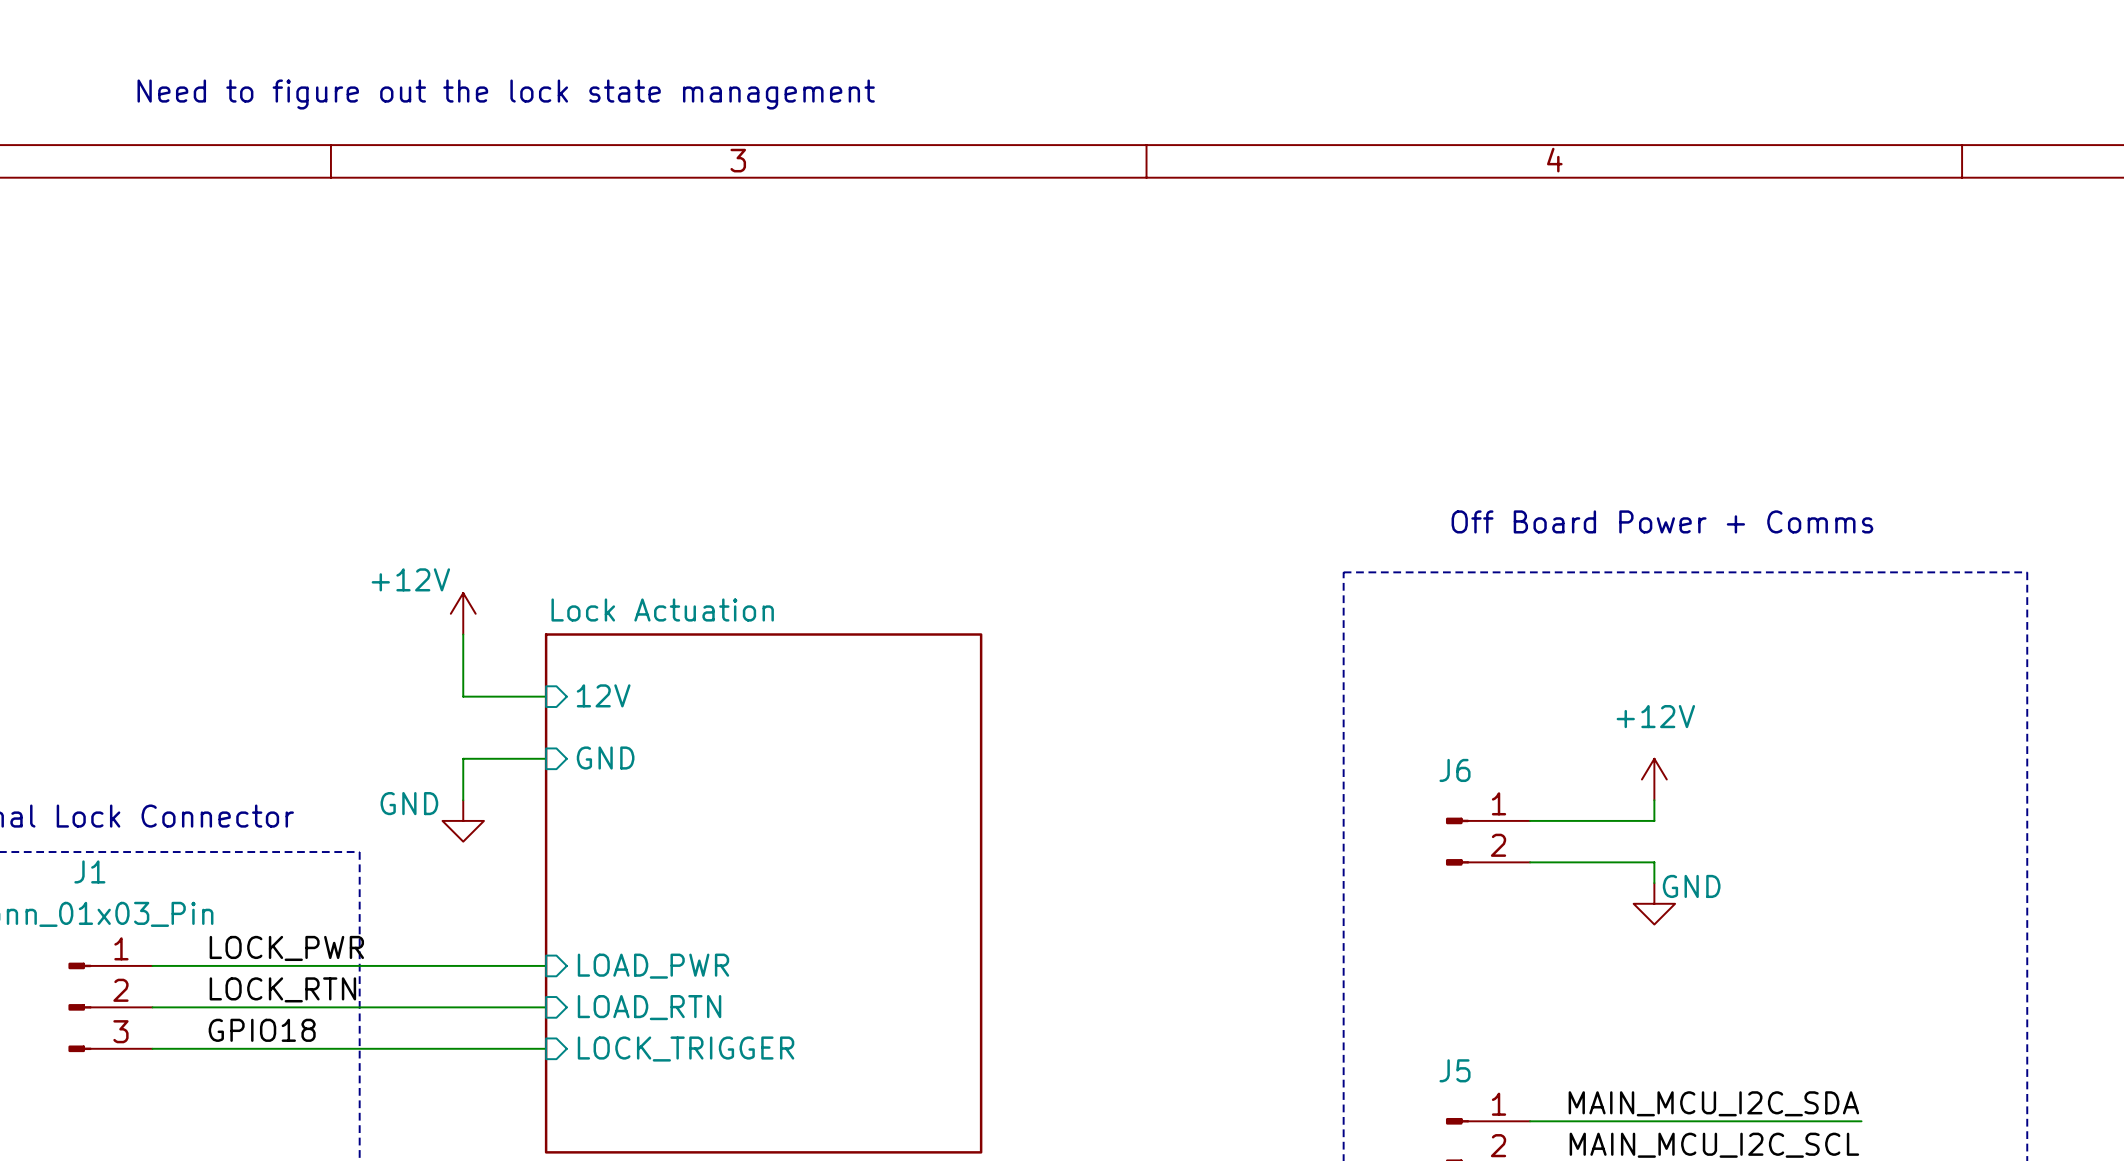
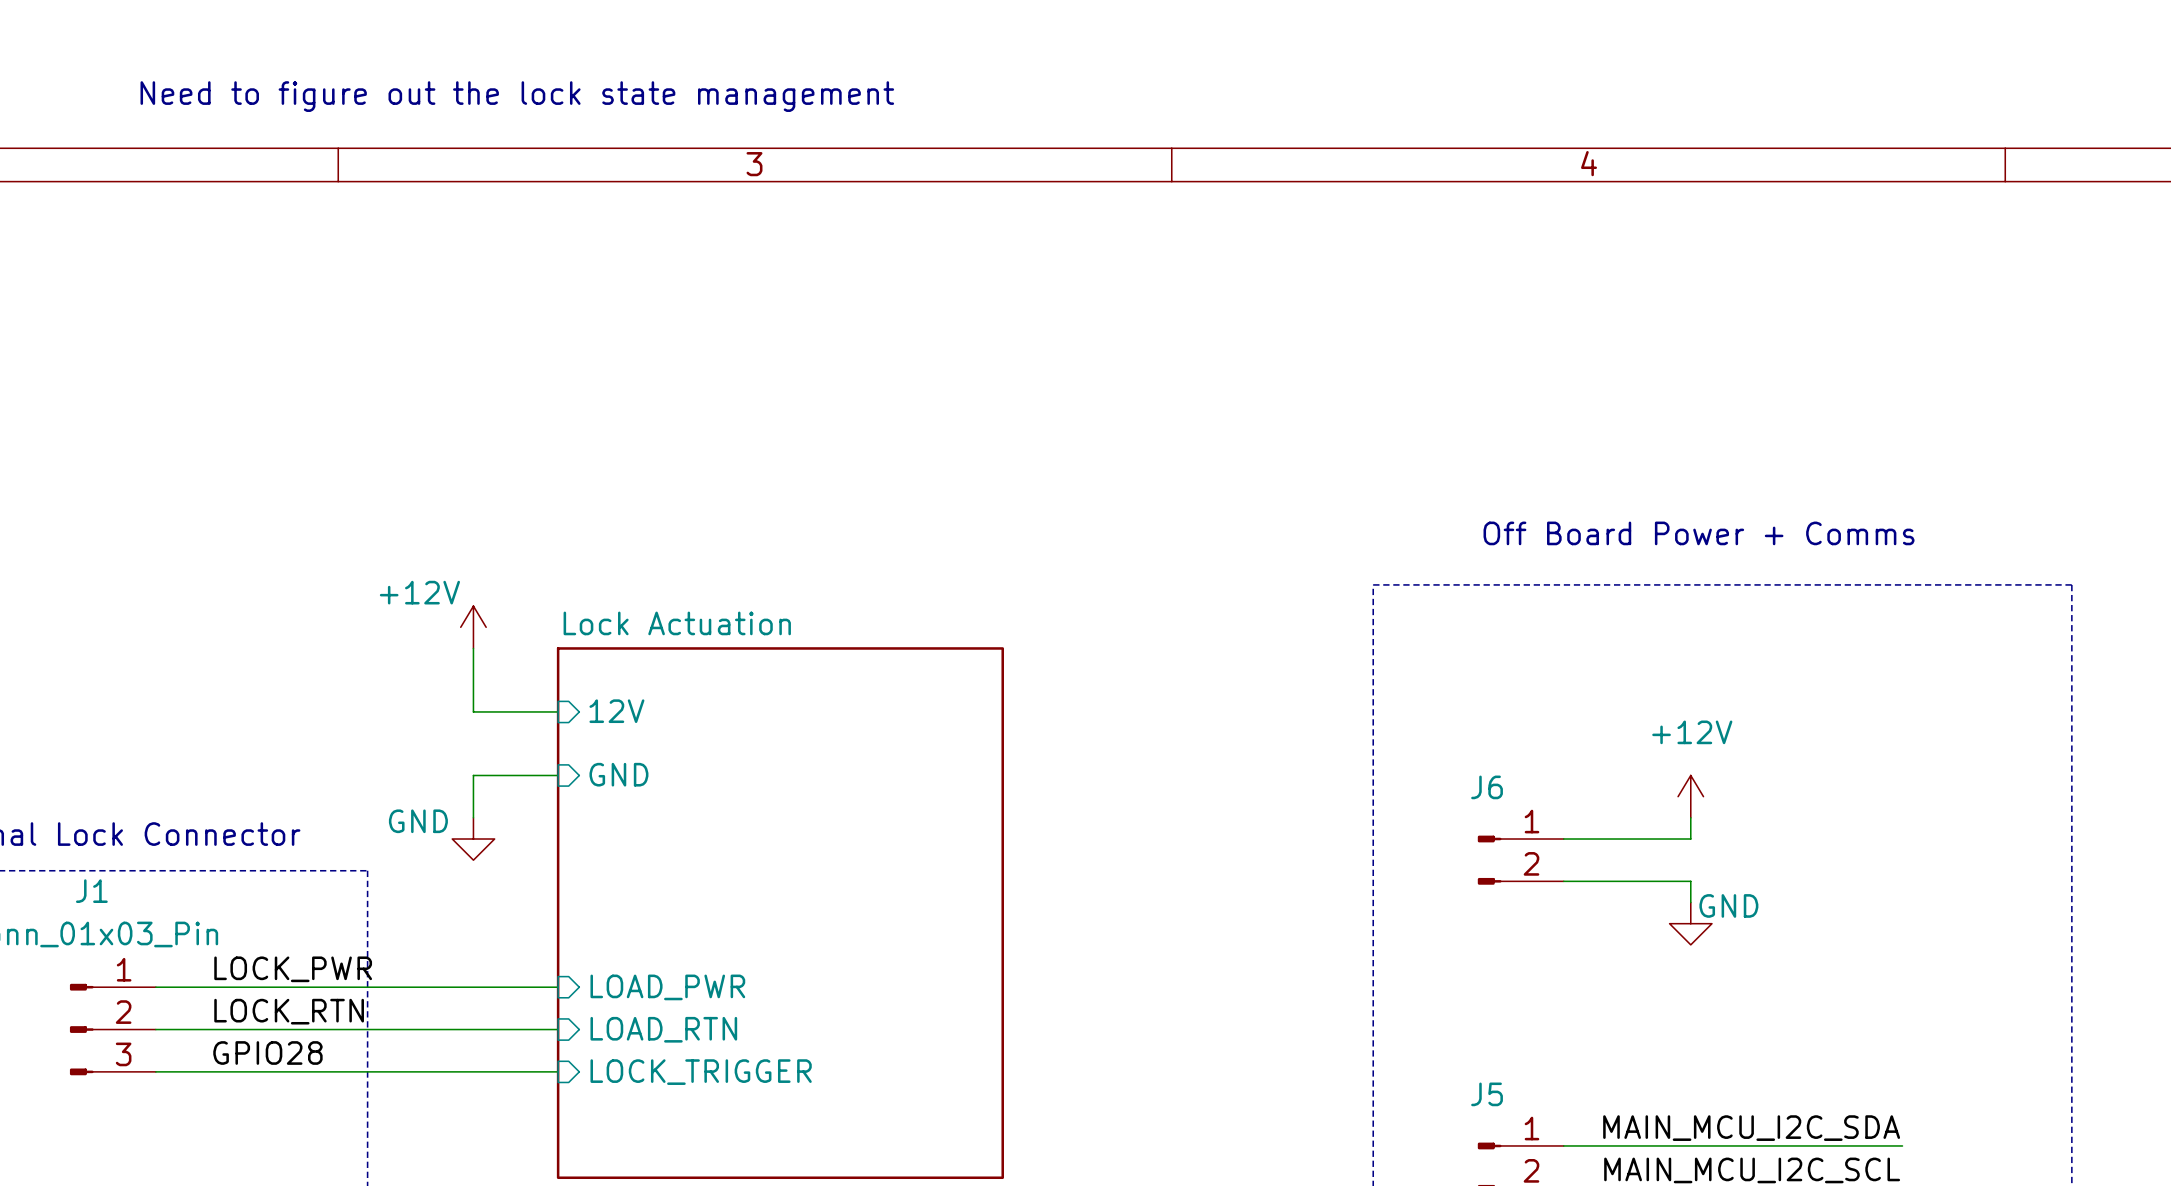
label: GPIO18 (262, 1030) -> GPIO28 (267, 1052)

